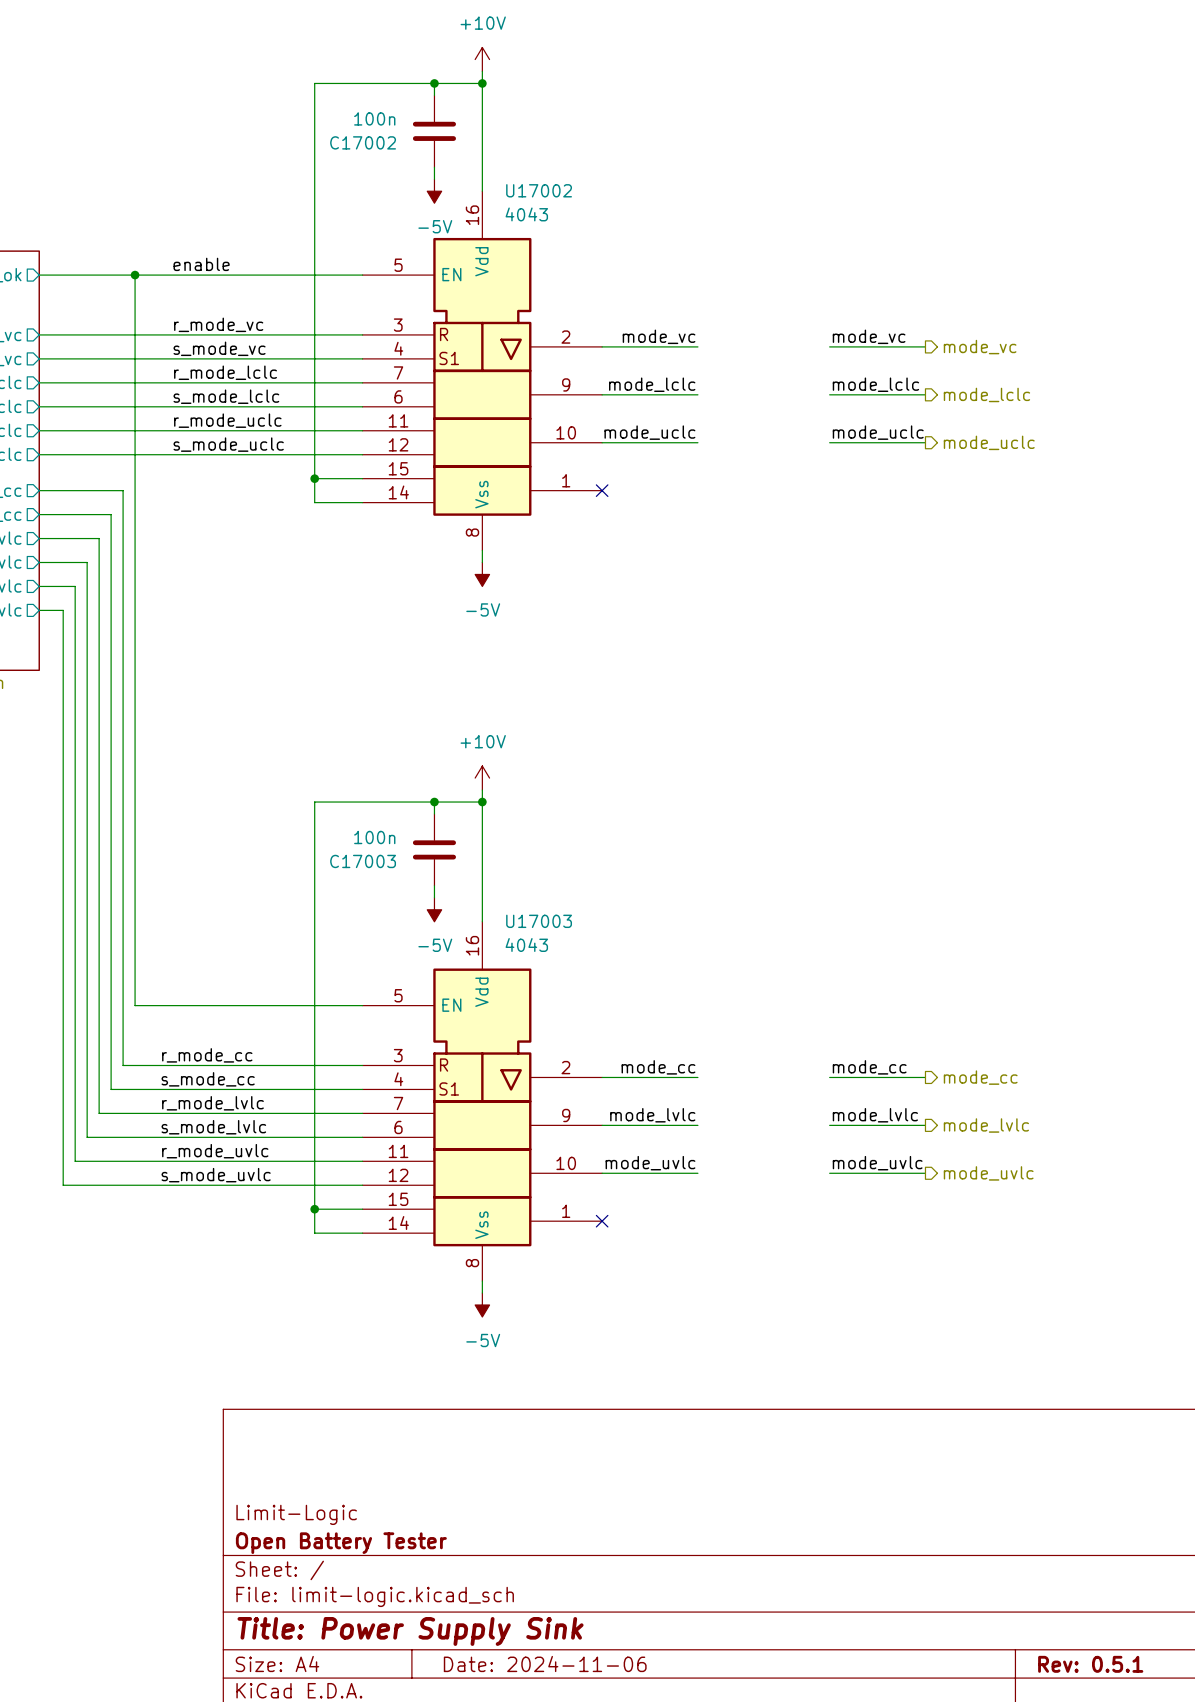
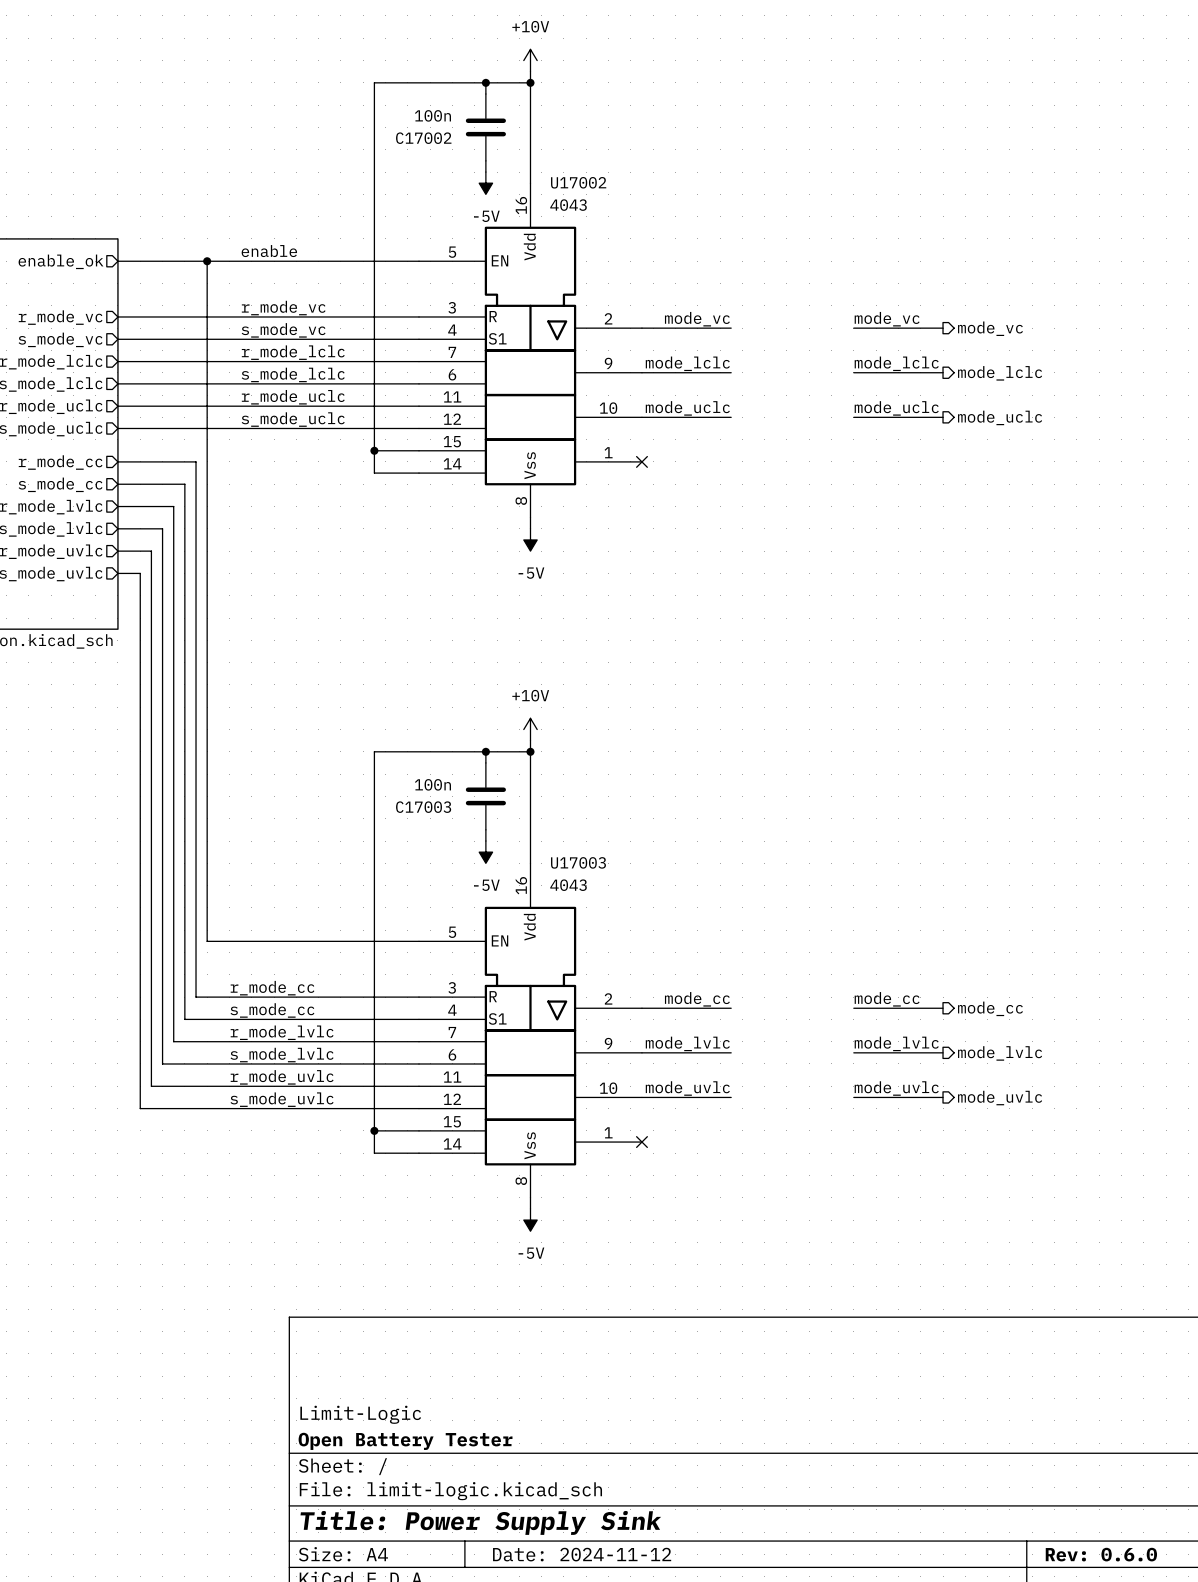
title block: Date: 2024-11-06 (545, 1664) -> Date: 2024-11-12 (582, 1554)
title block: Rev: 0.5.1 (1090, 1664) -> Rev: 0.6.0 (1101, 1554)

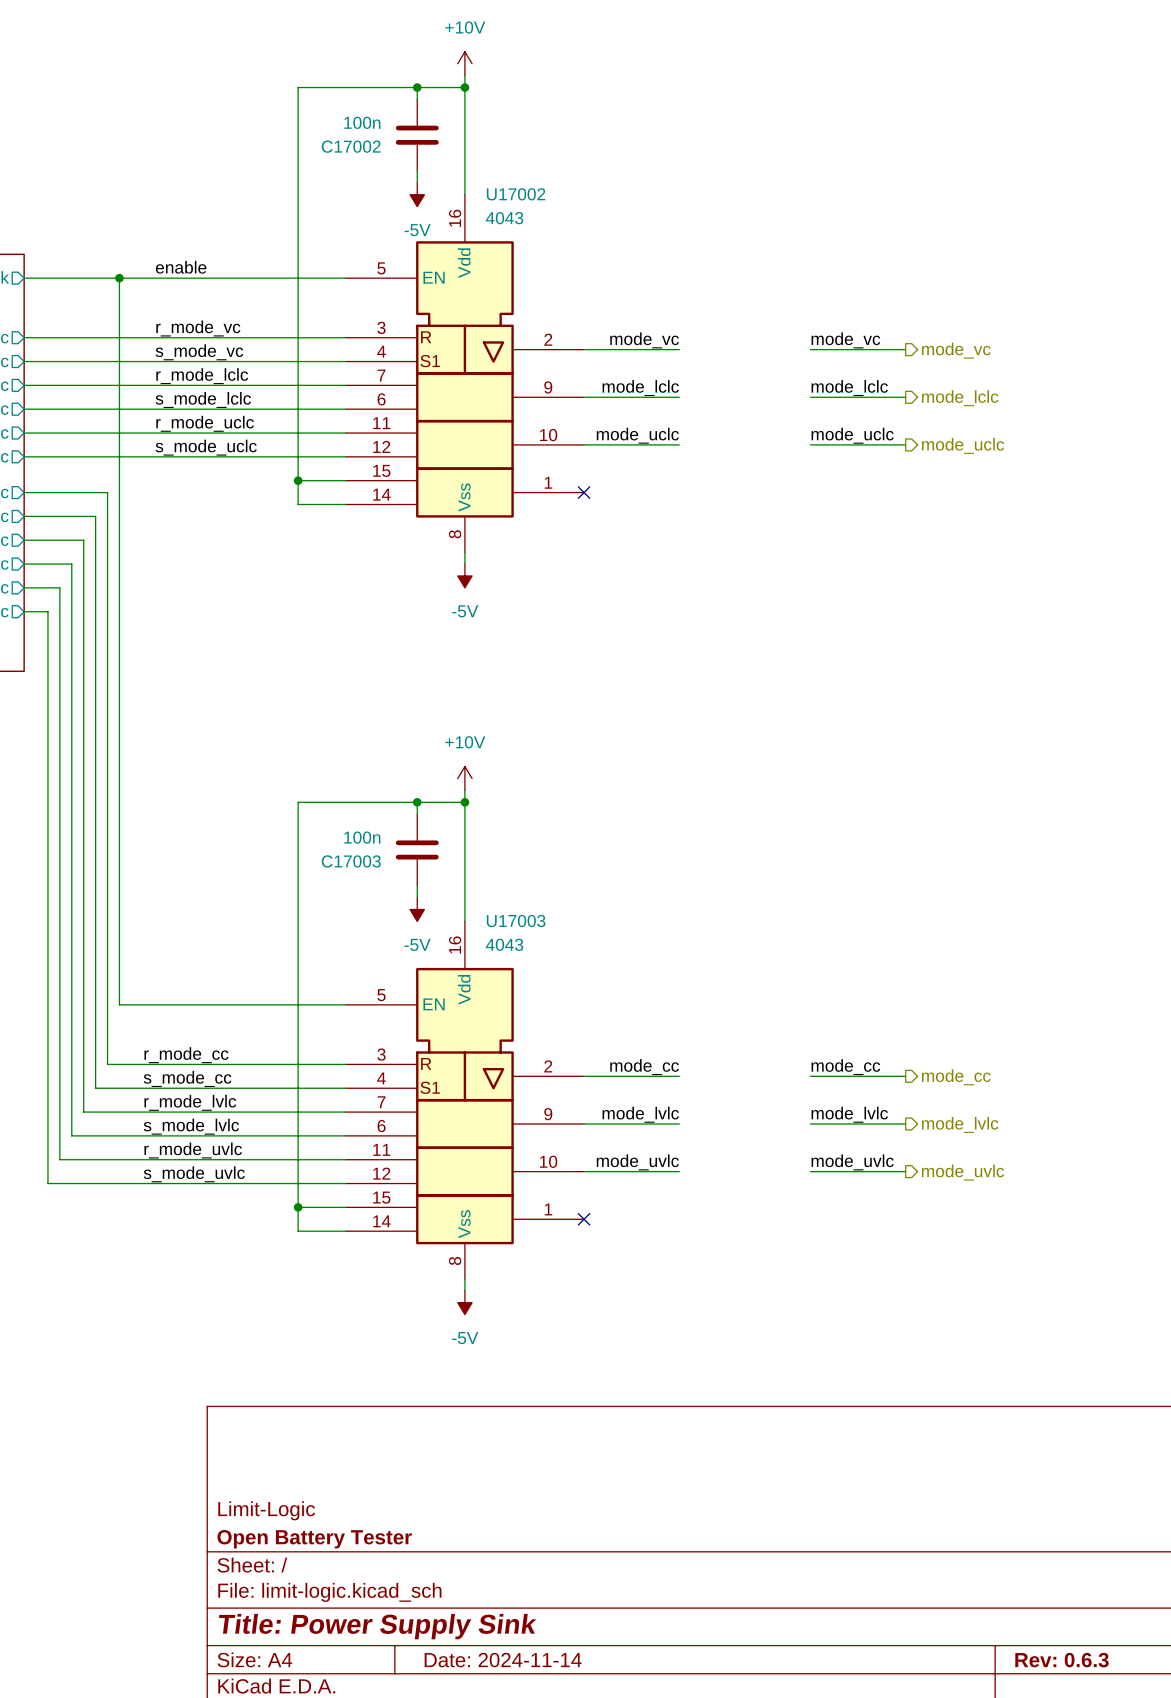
title block: Date: 2024-11-12 (582, 1554) -> Date: 2024-11-14 (503, 1660)
title block: Rev: 0.6.0 (1101, 1554) -> Rev: 0.6.3 (1062, 1660)

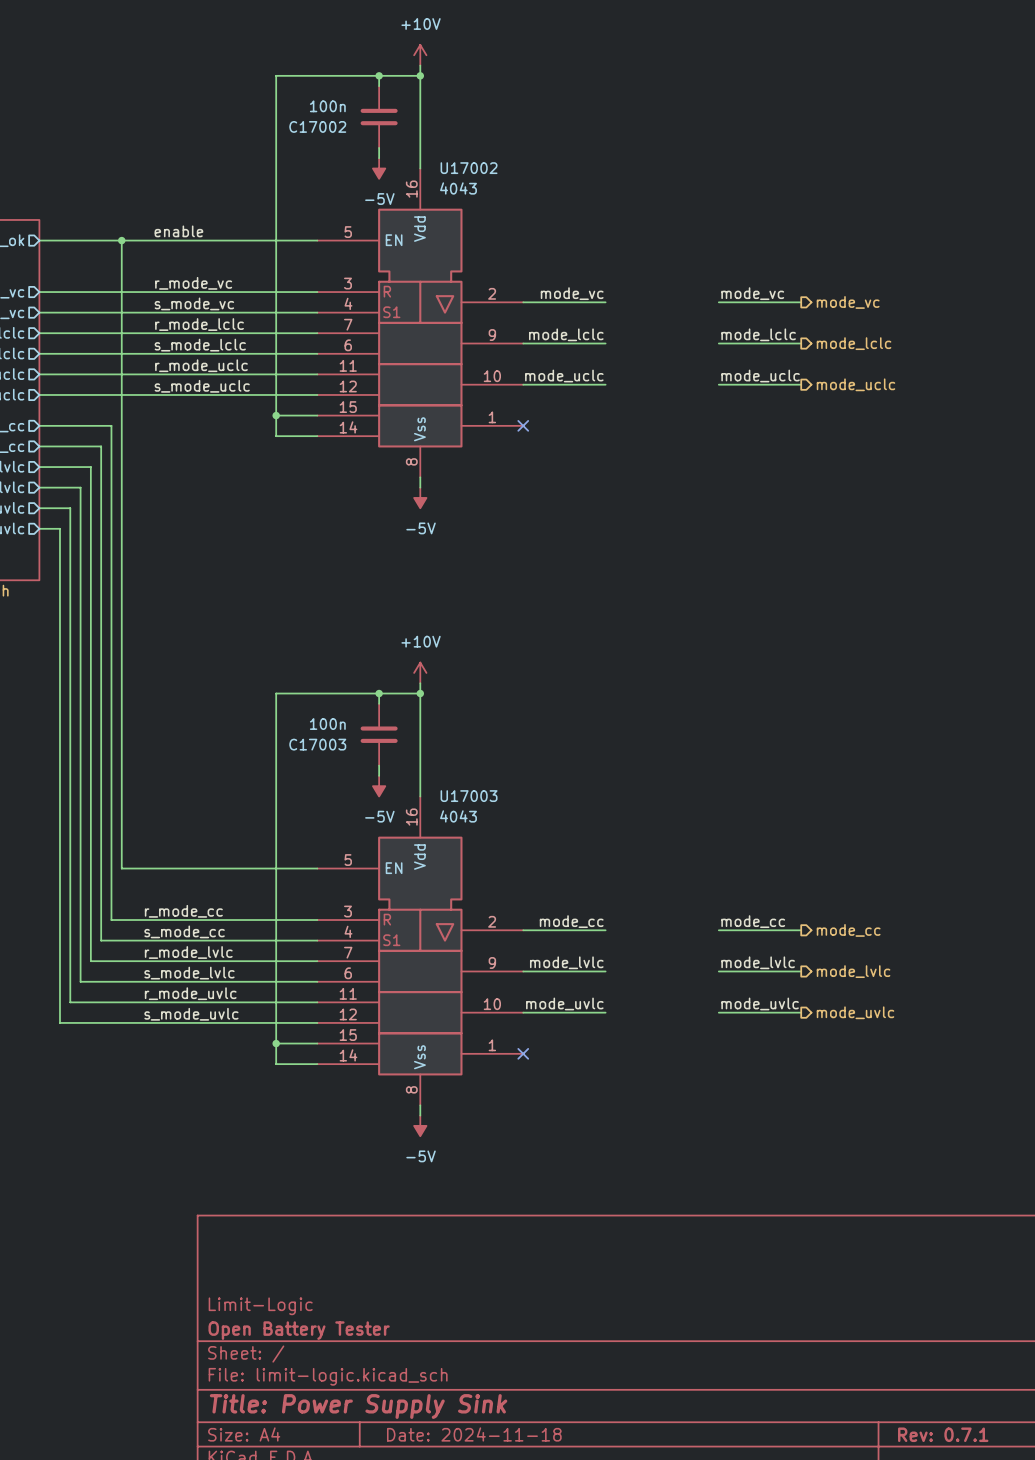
title block: Date: 2024-11-14 (503, 1660) -> Date: 2024-11-18 (474, 1434)
title block: Rev: 0.6.3 (1062, 1660) -> Rev: 0.7.1 (943, 1434)

